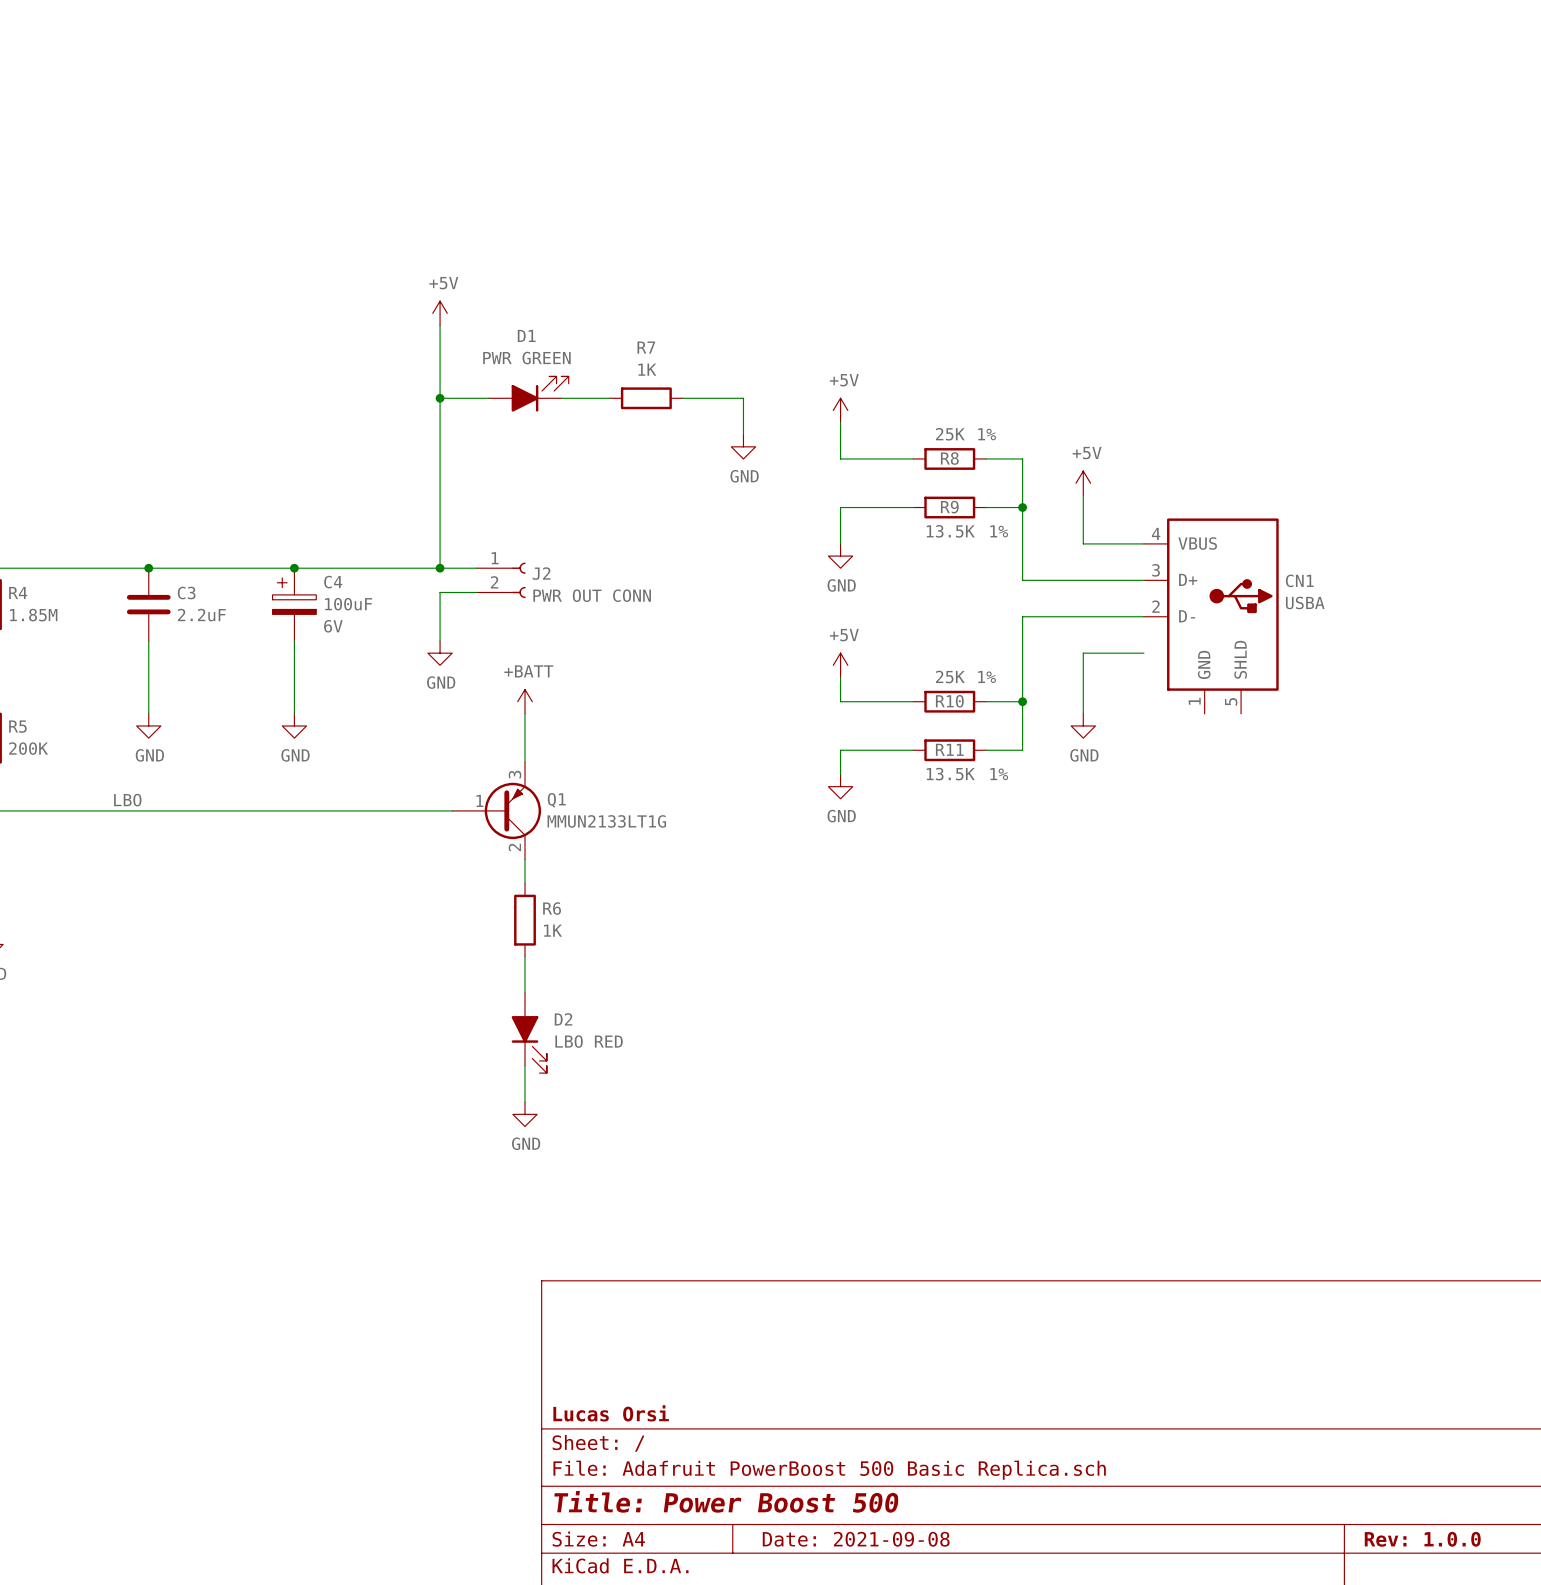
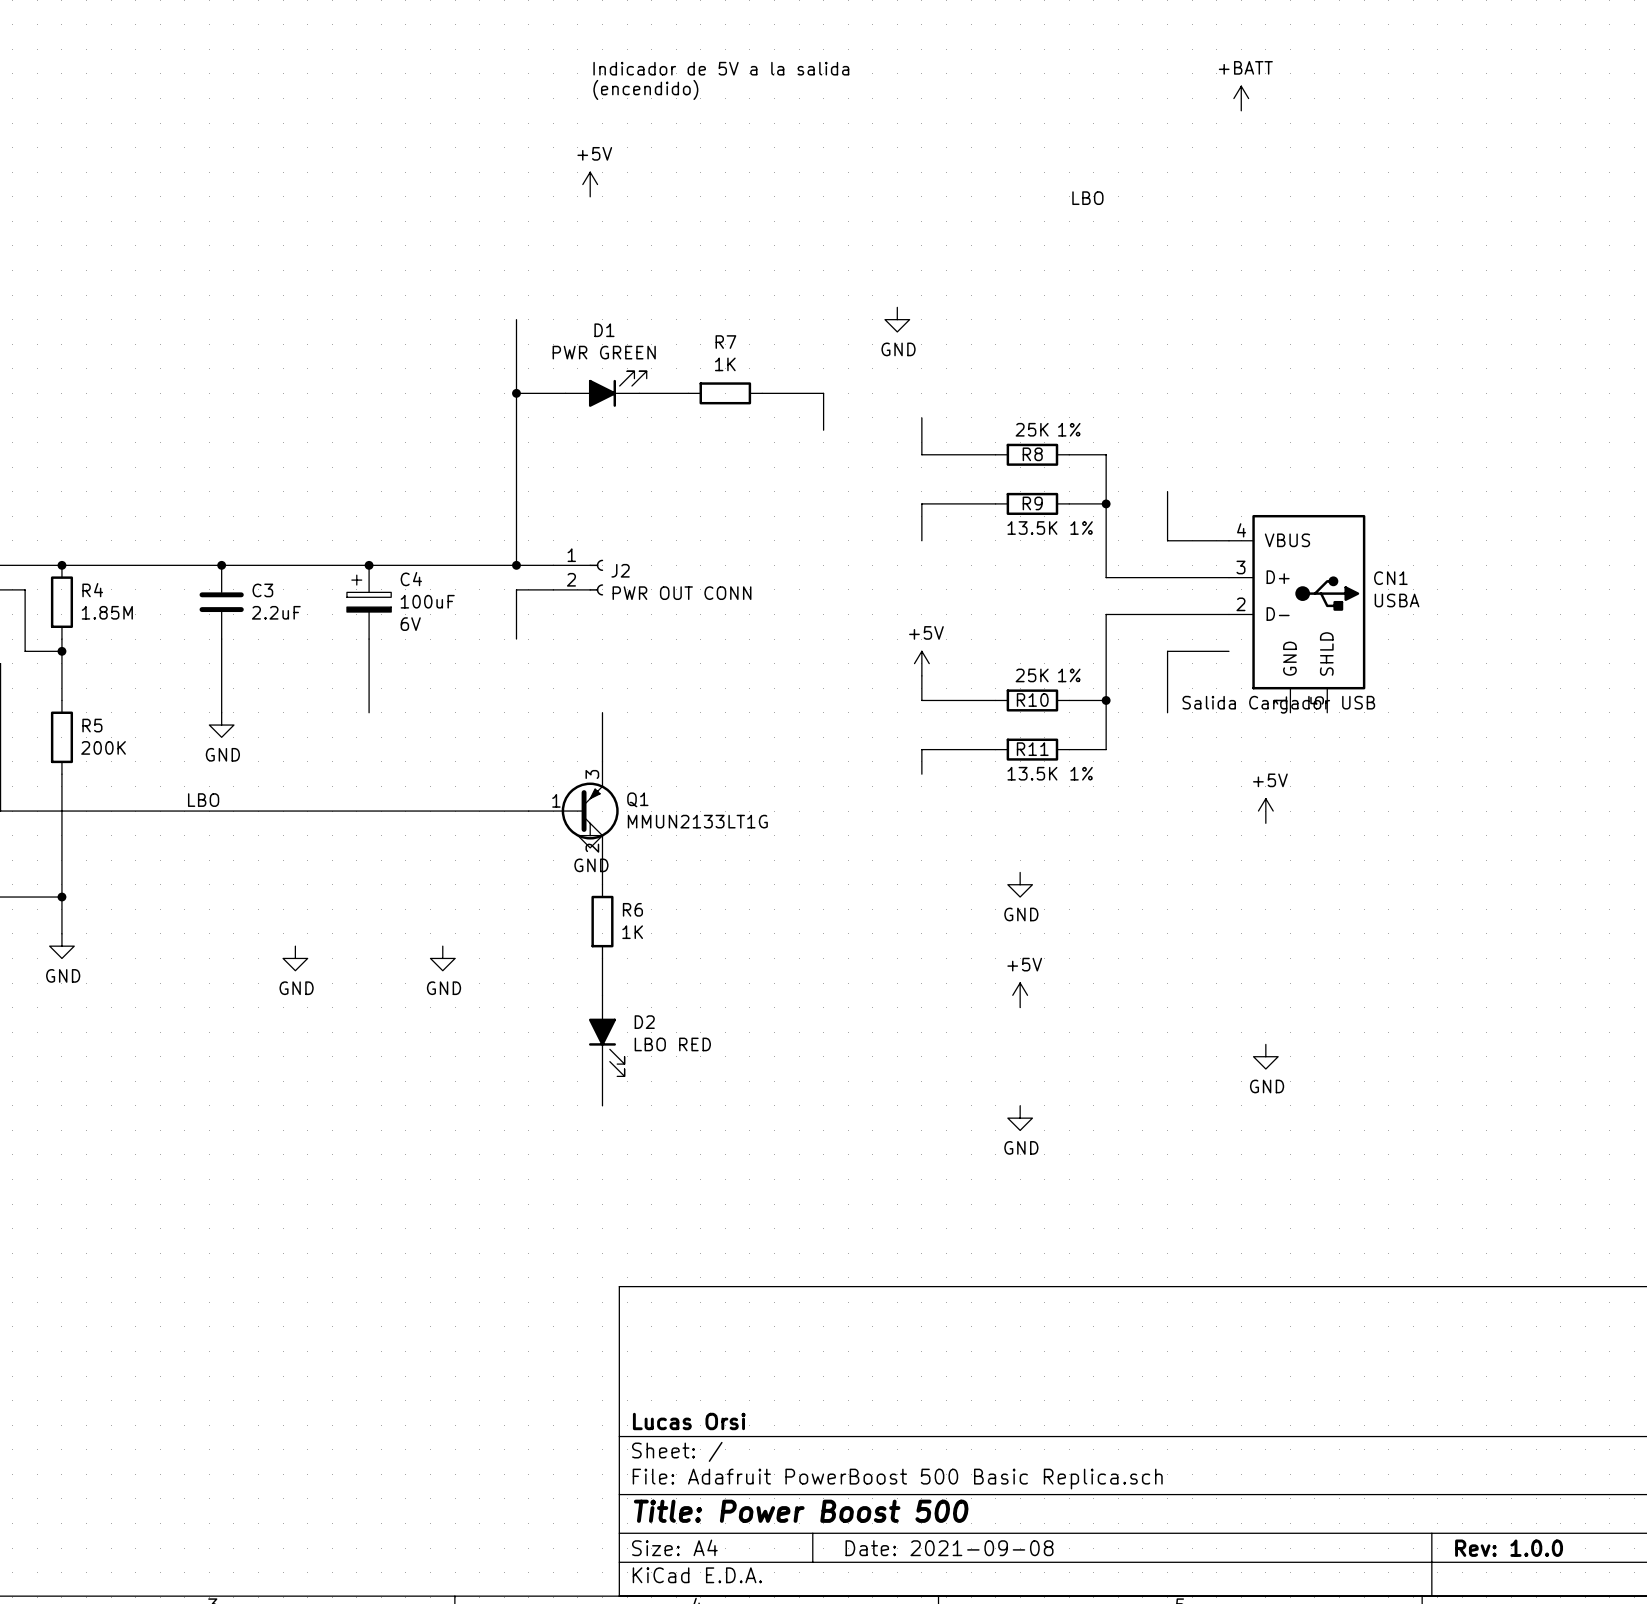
text: none -> Indicador de 5V a la salida (721, 68)
text: none -> (encendido) (645, 89)
power symbol: none -> +BATT (1241, 98)
label: none -> LBO (1087, 198)
power symbol position: +5V (440, 313) -> +5V (590, 184)
power symbol: none -> GND (897, 319)
power symbol: +5V (840, 410) -> none
power symbol: GND (743, 446) -> none
power symbol: +5V (1083, 483) -> none
power symbol: GND (840, 556) -> none
power symbol: GND (440, 653) -> none
power symbol: +BATT (525, 701) -> none
text: none -> Salida Cargador USB (1278, 704)
power symbol: GND (294, 725) -> none
power symbol: GND (1083, 725) -> none
power symbol: GND (840, 786) -> none
power symbol: none -> +5V (1265, 811)
power symbol: none -> GND (590, 835)
power symbol: none -> GND (1020, 884)
power symbol: none -> GND (295, 958)
power symbol: none -> GND (442, 958)
power symbol: none -> +5V (1020, 995)
power symbol: none -> GND (1265, 1056)
power symbol: GND (525, 1114) -> none
power symbol: none -> GND (1020, 1118)

